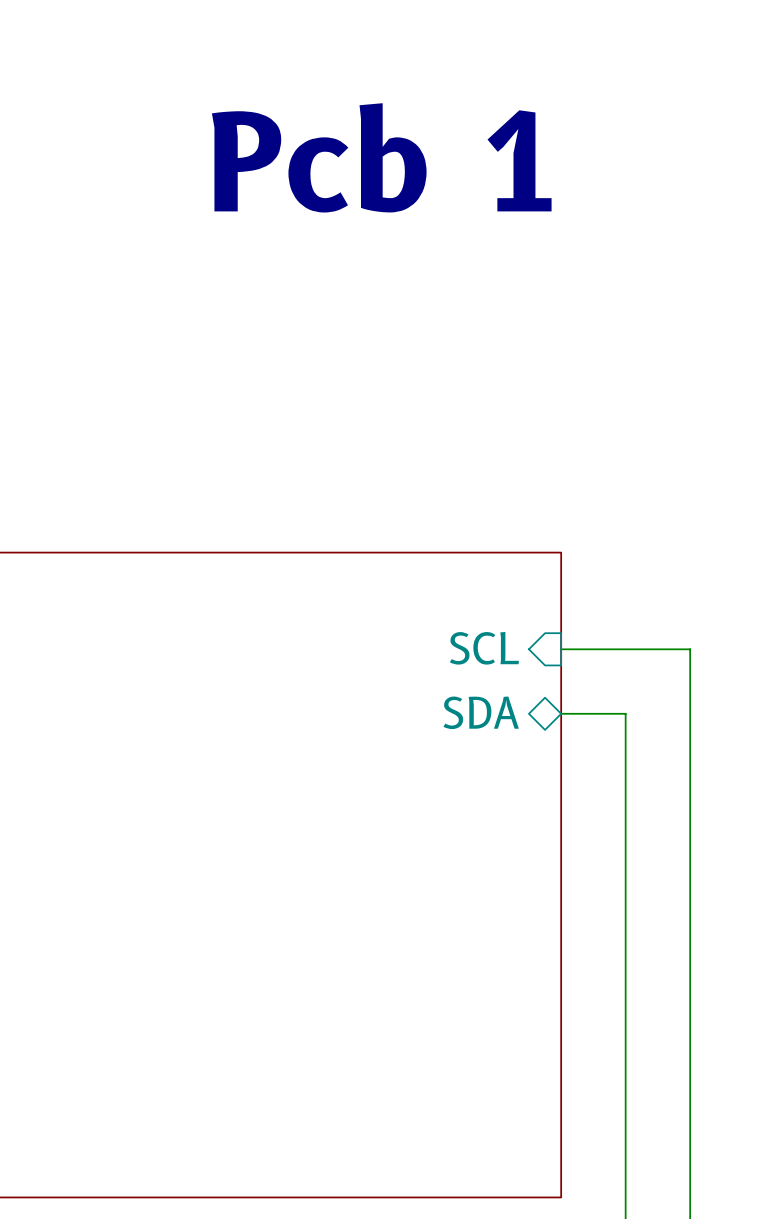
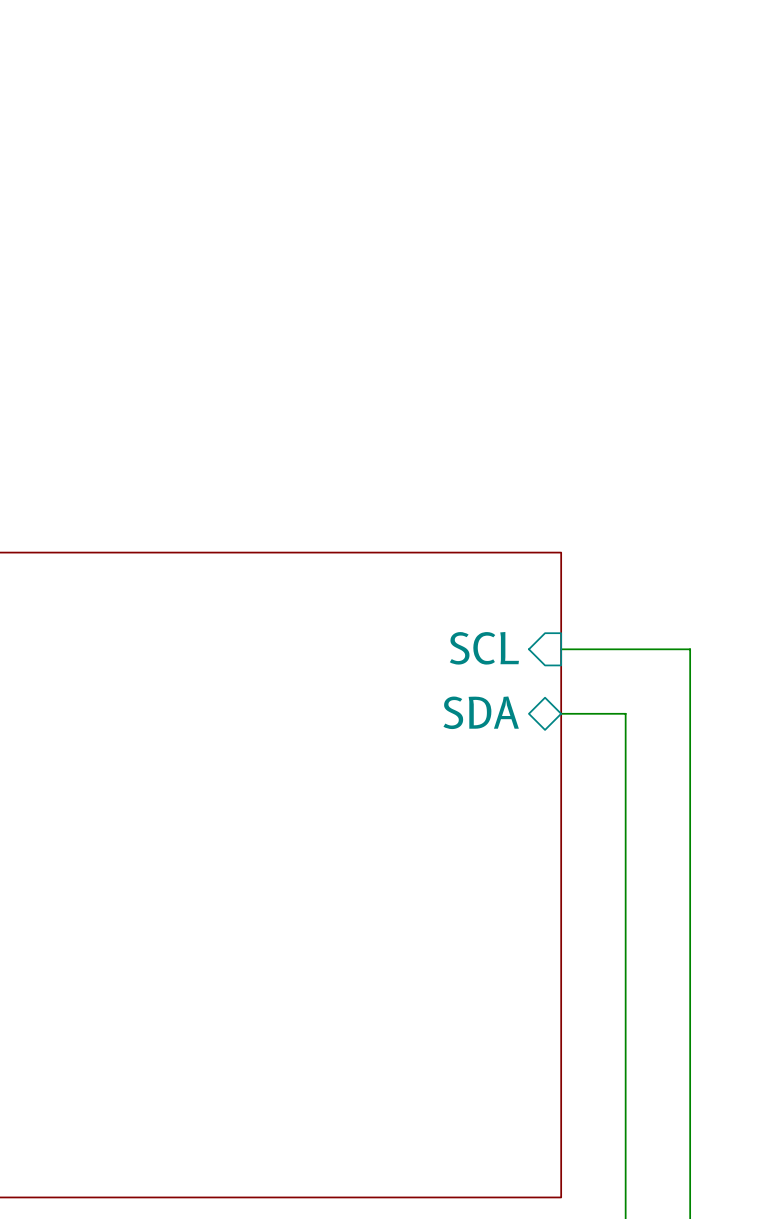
text: Pcb 1 (381, 157) -> none

